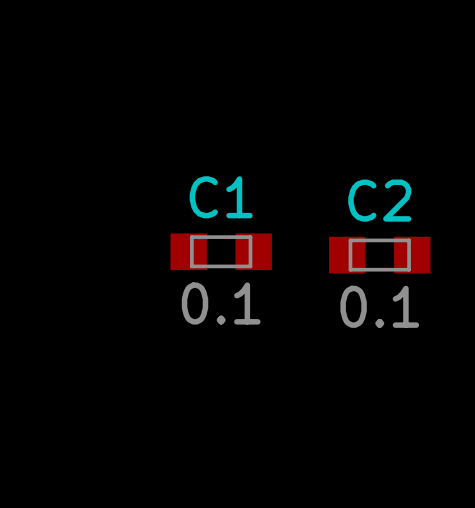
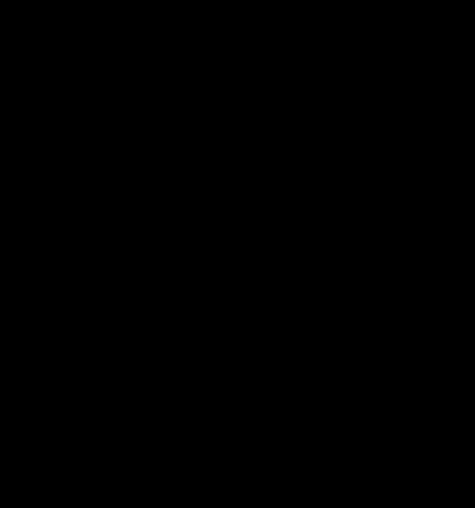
C1: 0.1 (221, 251) -> none
C2: 0.1 (379, 255) -> none

